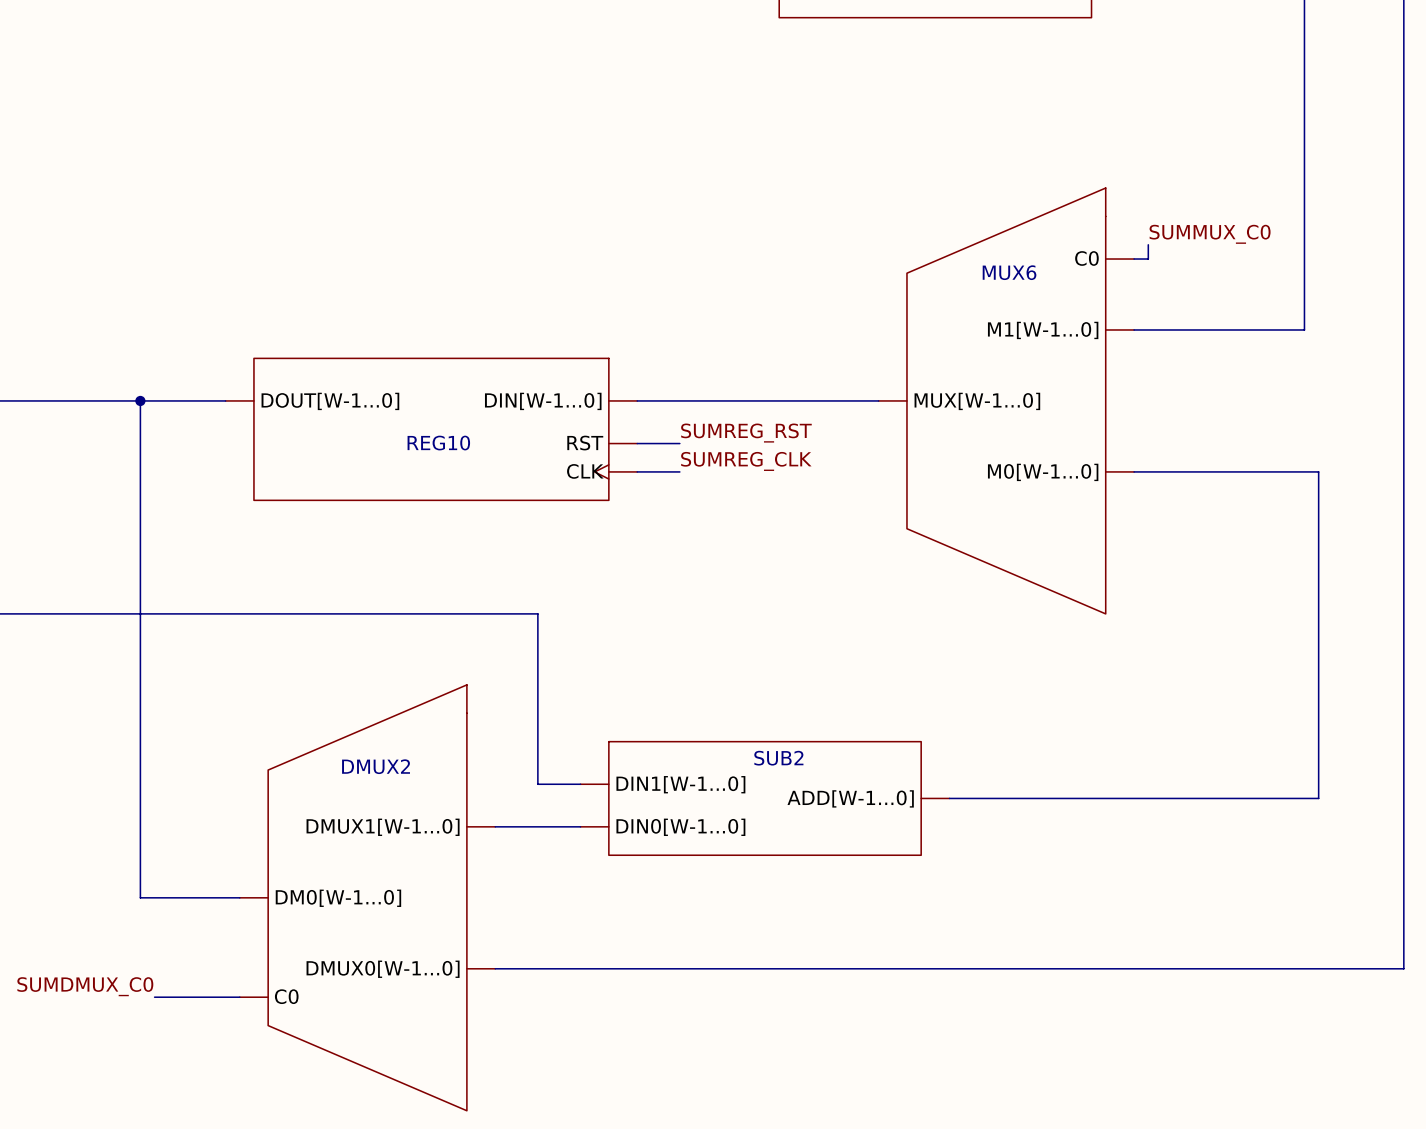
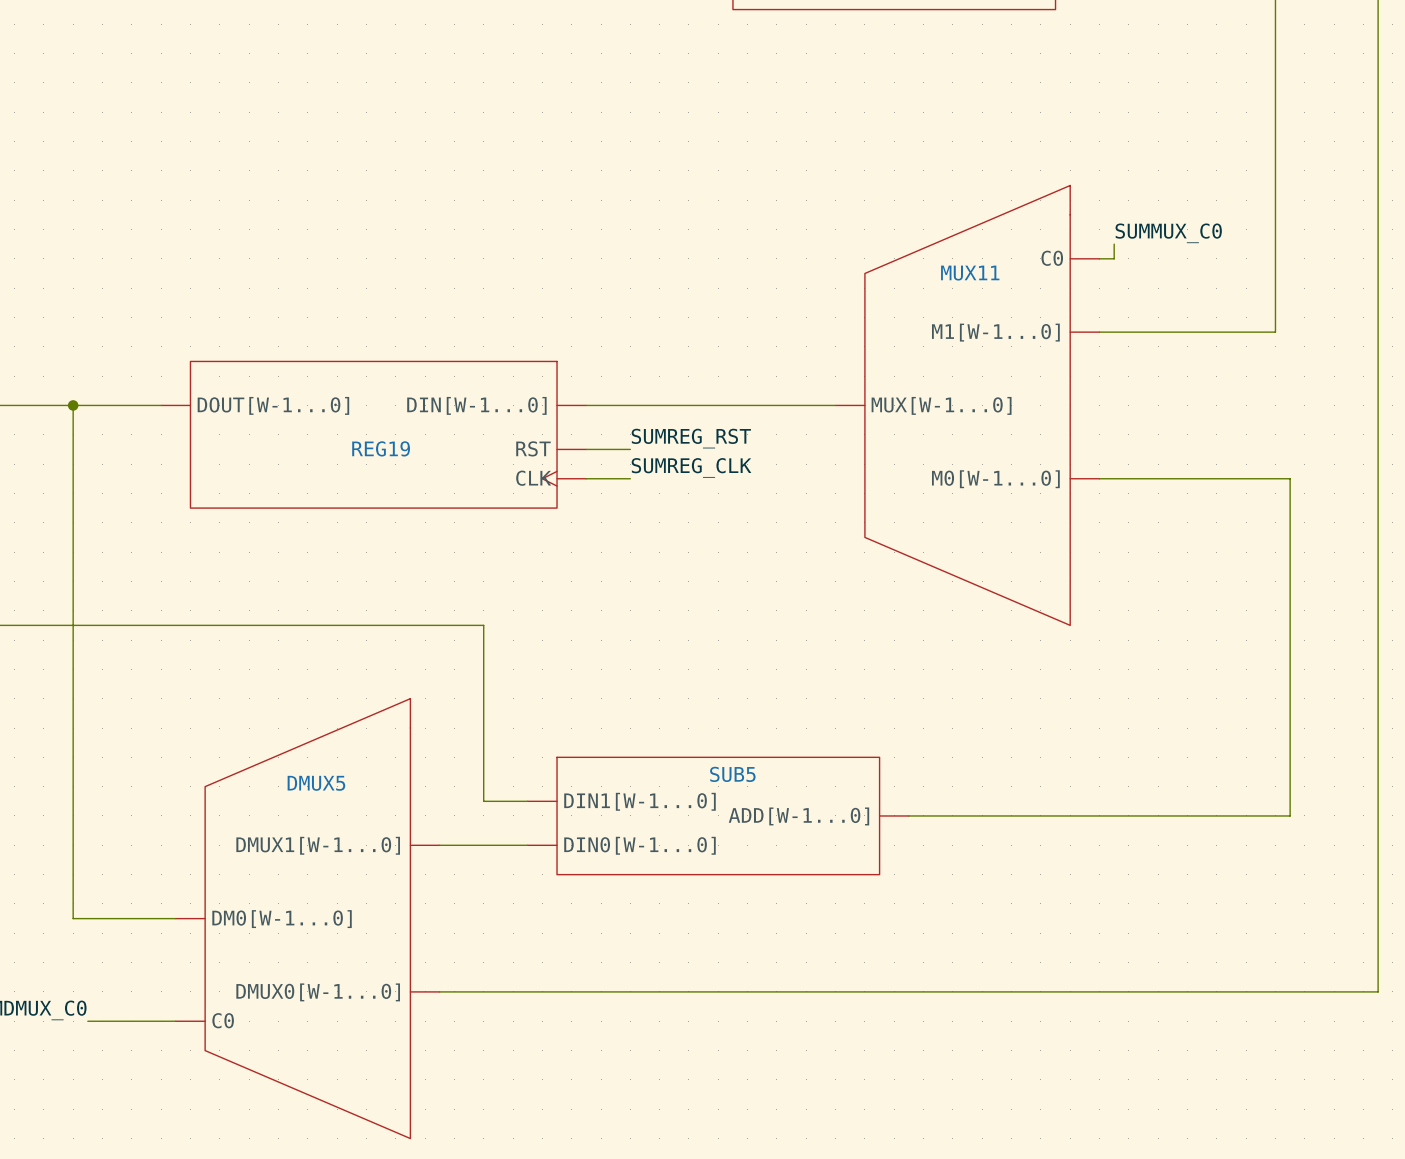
MUX6 name: MUX6 (1009, 272) -> MUX11 (970, 273)
REG10 name: REG10 (438, 443) -> REG19 (381, 448)
SUB2 name: SUB2 (778, 758) -> SUB5 (732, 774)
DMUX2 name: DMUX2 (376, 766) -> DMUX5 (316, 783)

